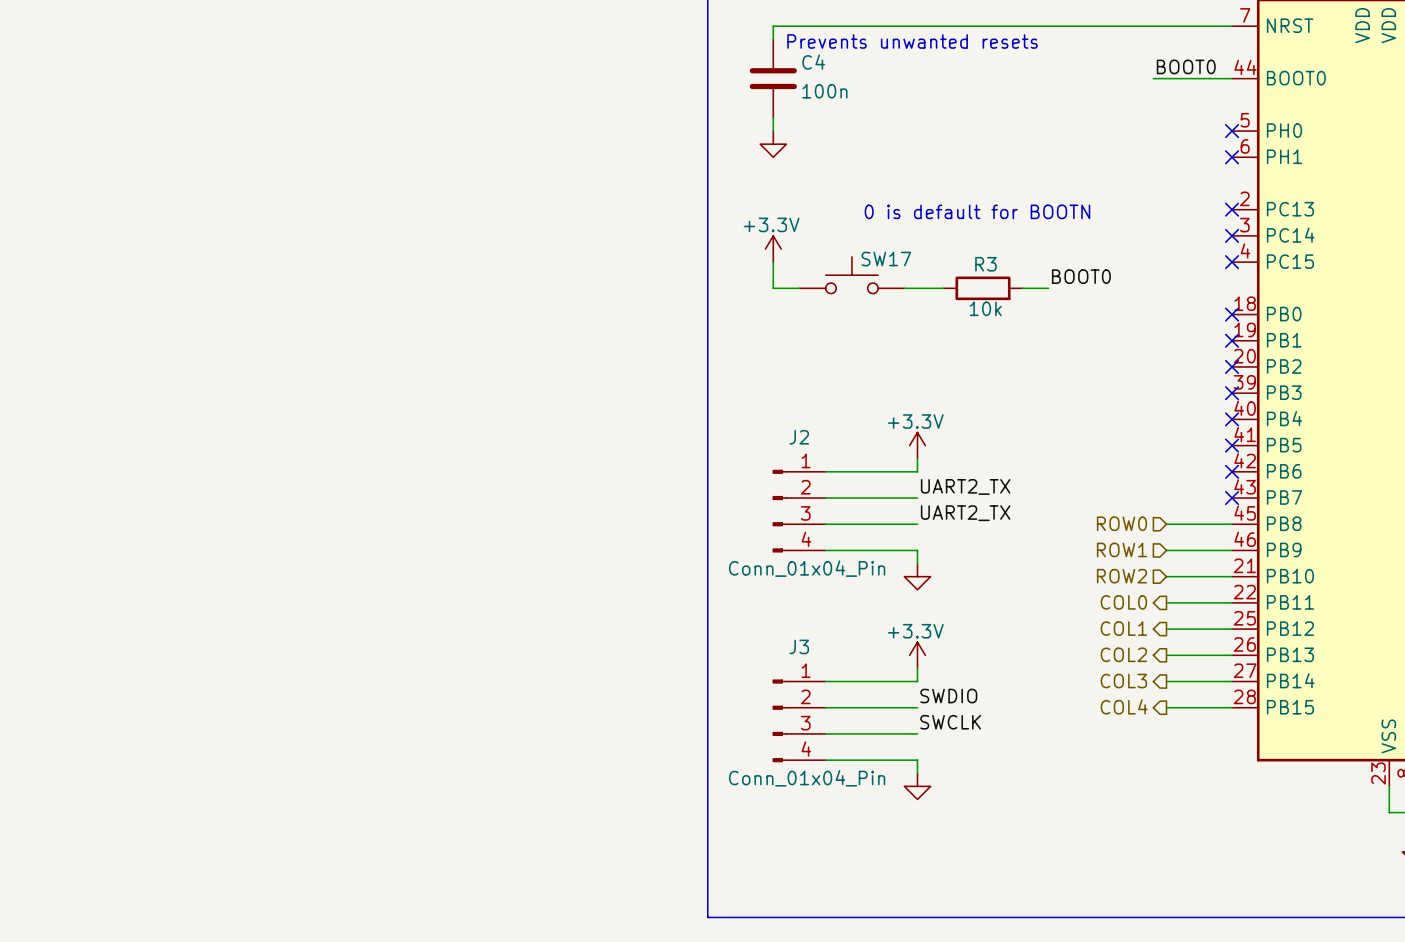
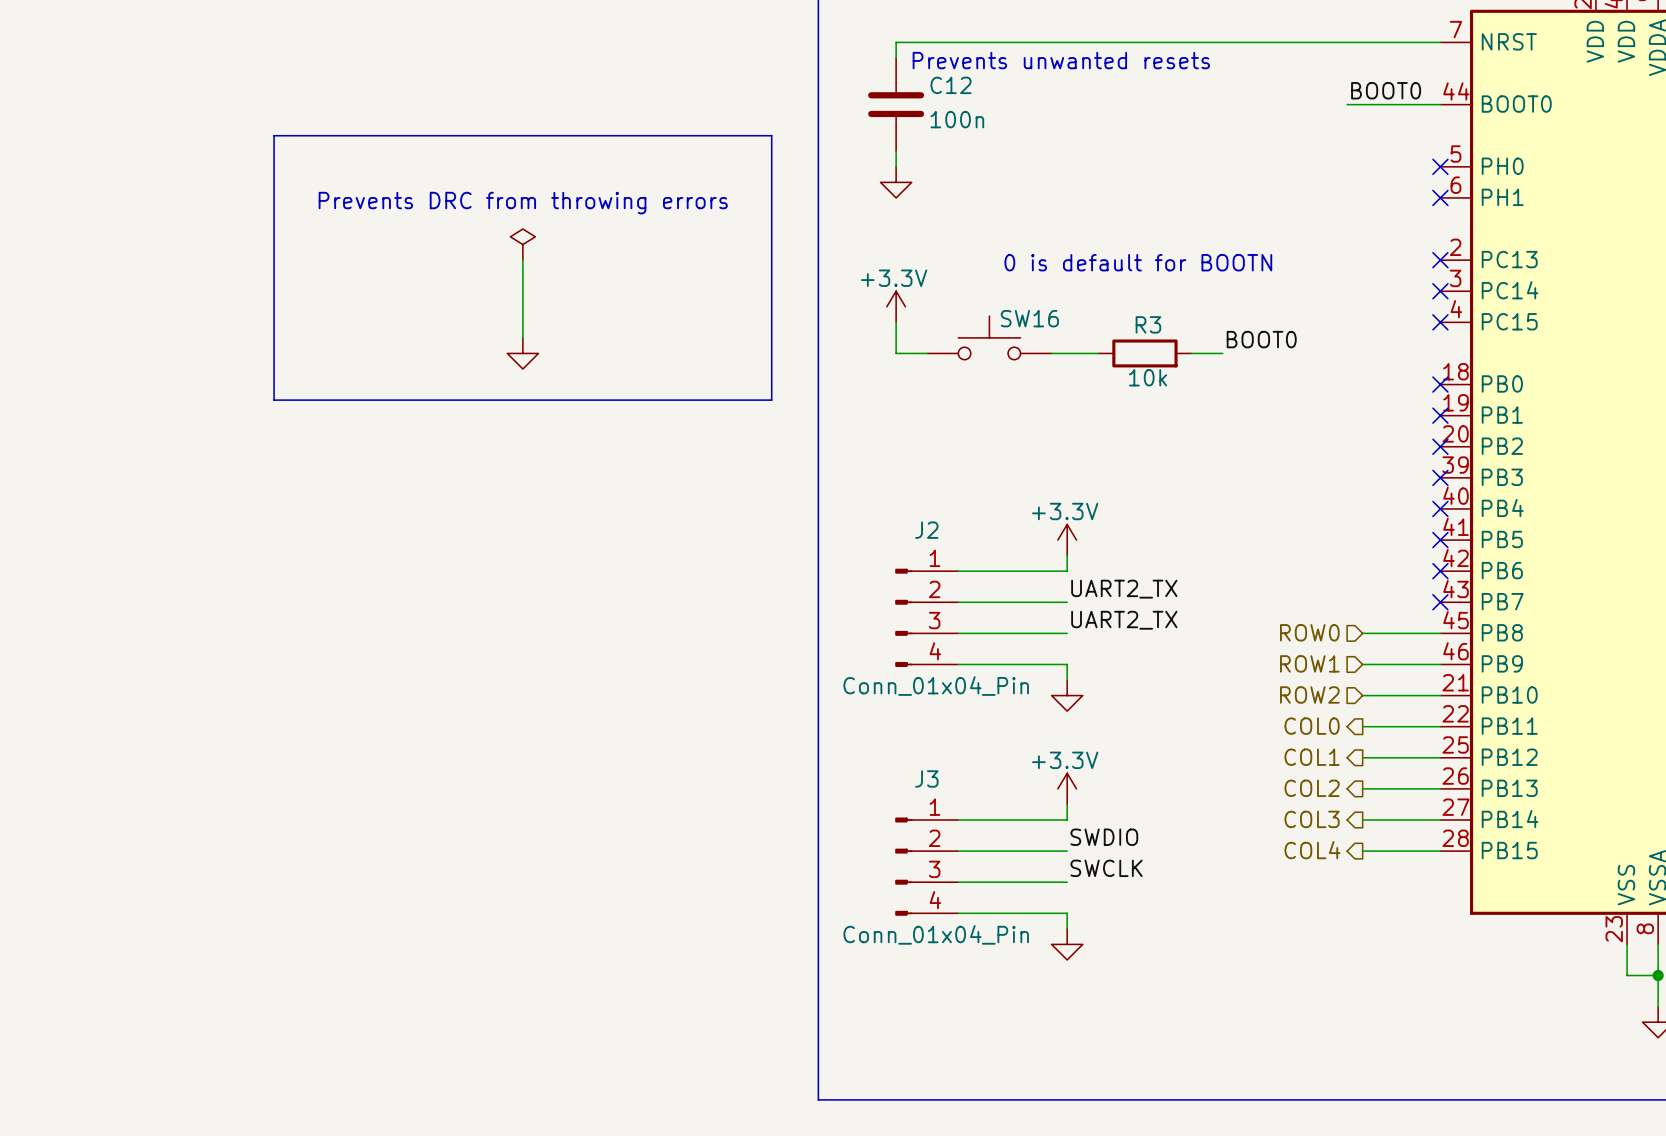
C4 name: C4 (813, 62) -> C12 (951, 85)
line: none -> (274, 135) (771, 135) (771, 400) (274, 400) (274, 135)
text: none -> Prevents DRC from throwing errors (523, 203)
power symbol: none -> (522, 244)
wire: none -> (522, 260) (522, 337)
SW17 name: SW17 (886, 259) -> SW16 (1029, 318)
power symbol: none -> (522, 353)

